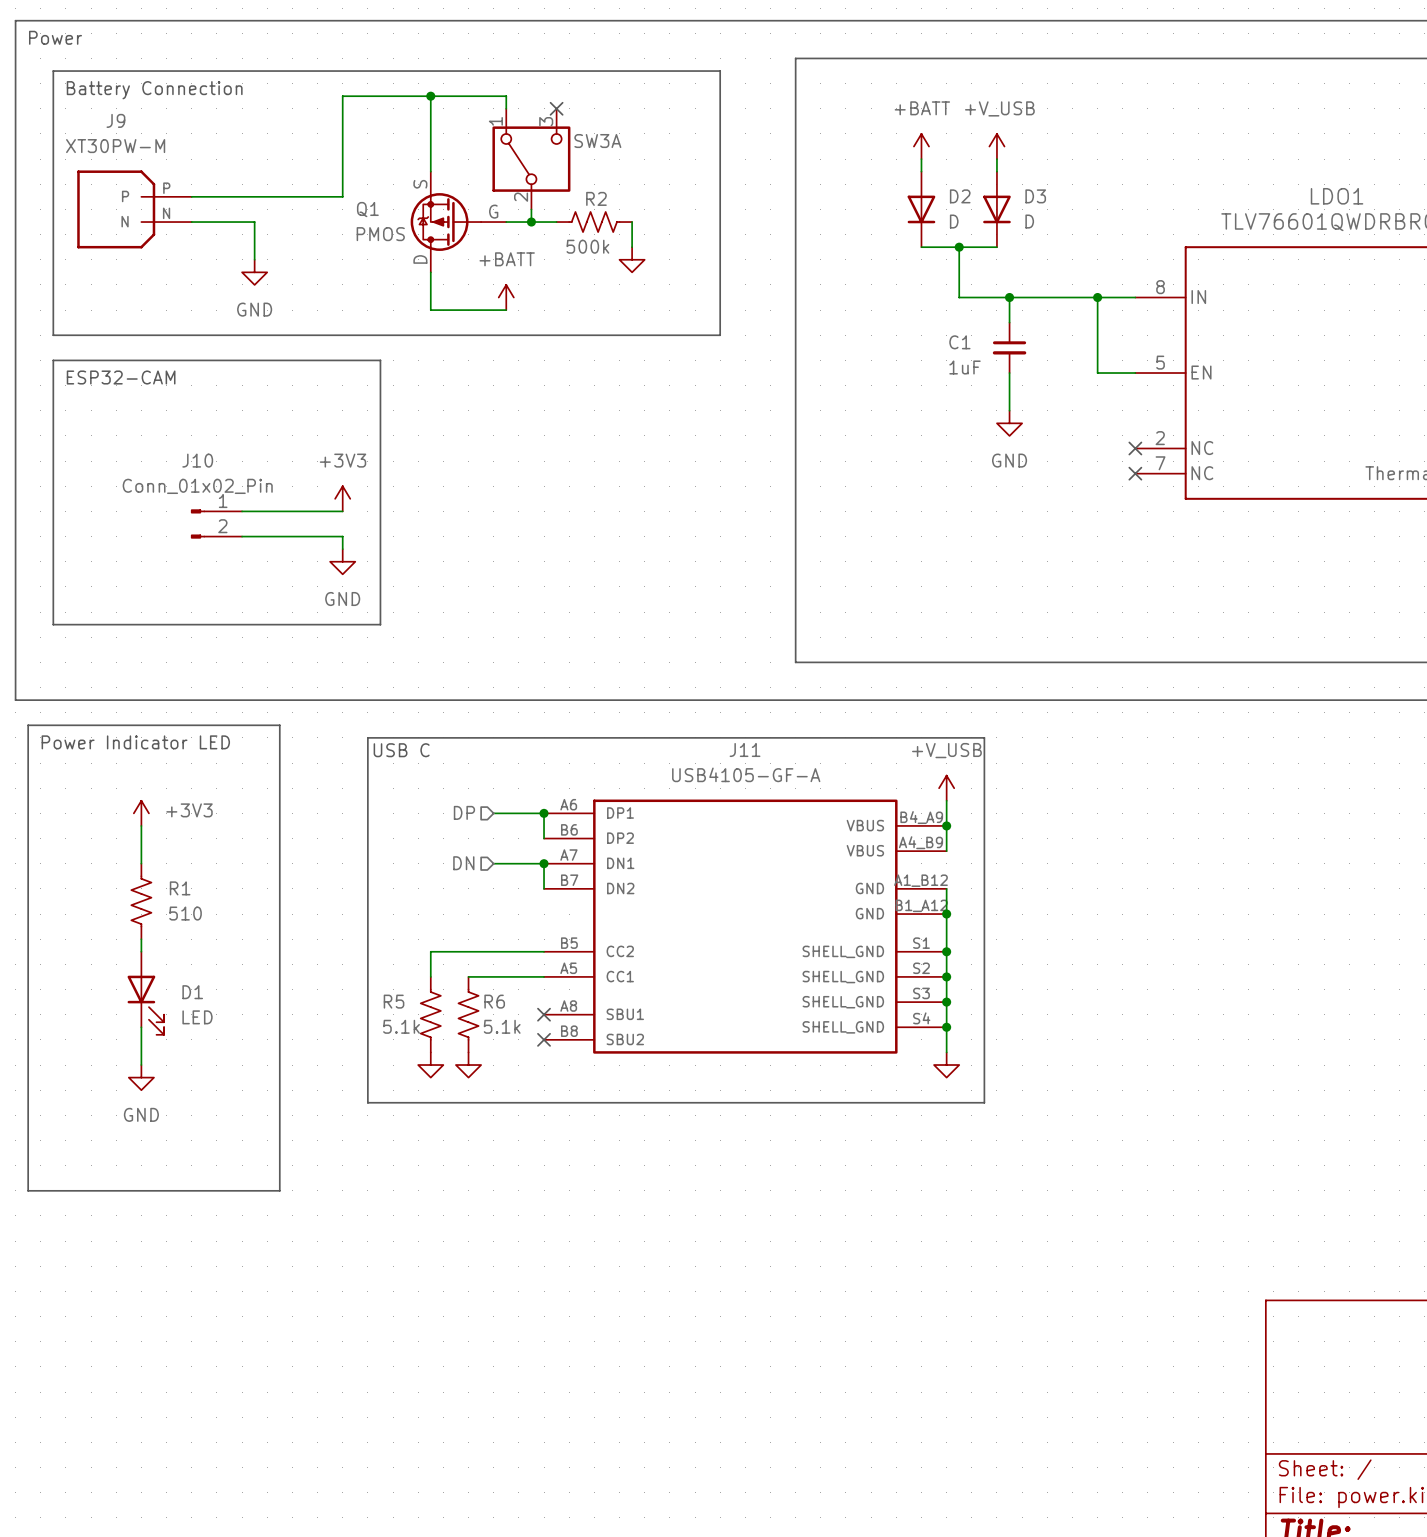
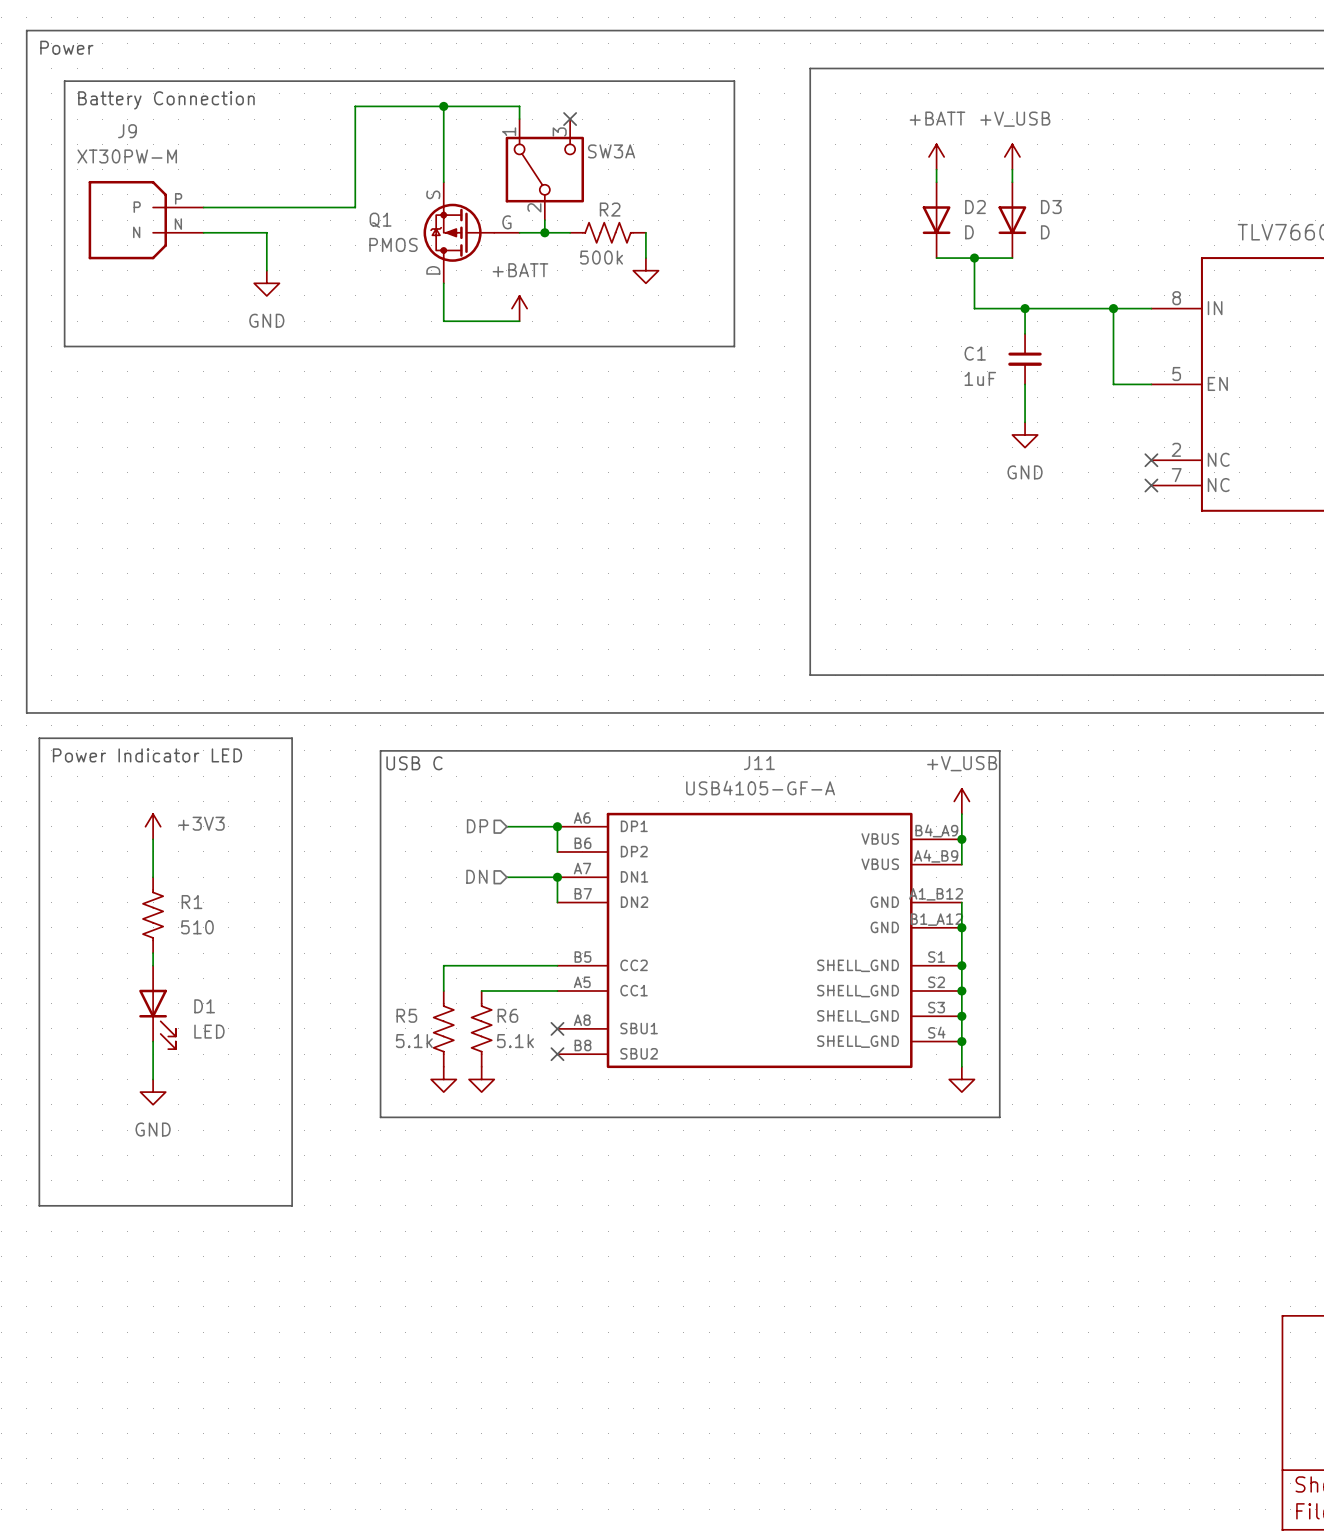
line: (53, 360) (380, 360) (380, 624) (53, 624) (53, 360) -> none
text: ESP32-CAM (121, 377) -> none
power symbol: +3V3 (342, 498) -> none
wire: (242, 511) (342, 511) -> none
J10: Conn_01x02_Pin (216, 523) -> none
wire: (242, 536) (342, 536) (342, 549) -> none
power symbol: GND (342, 561) -> none

